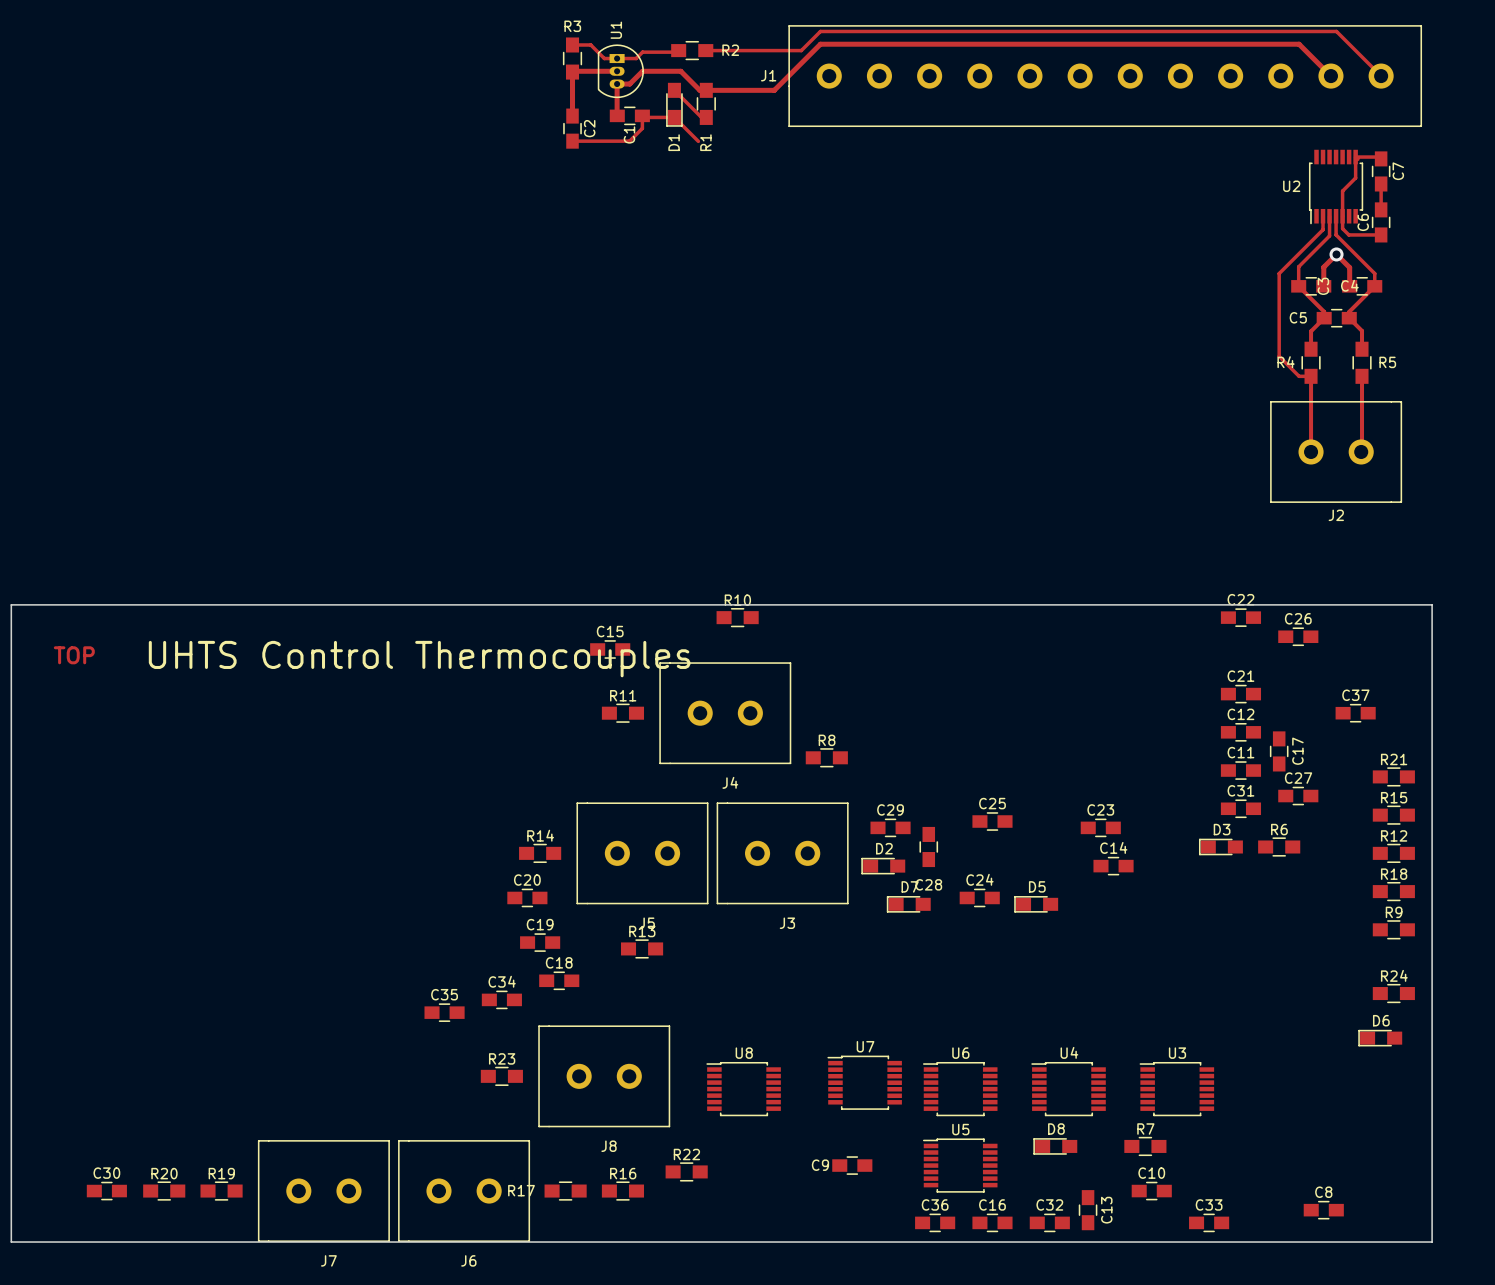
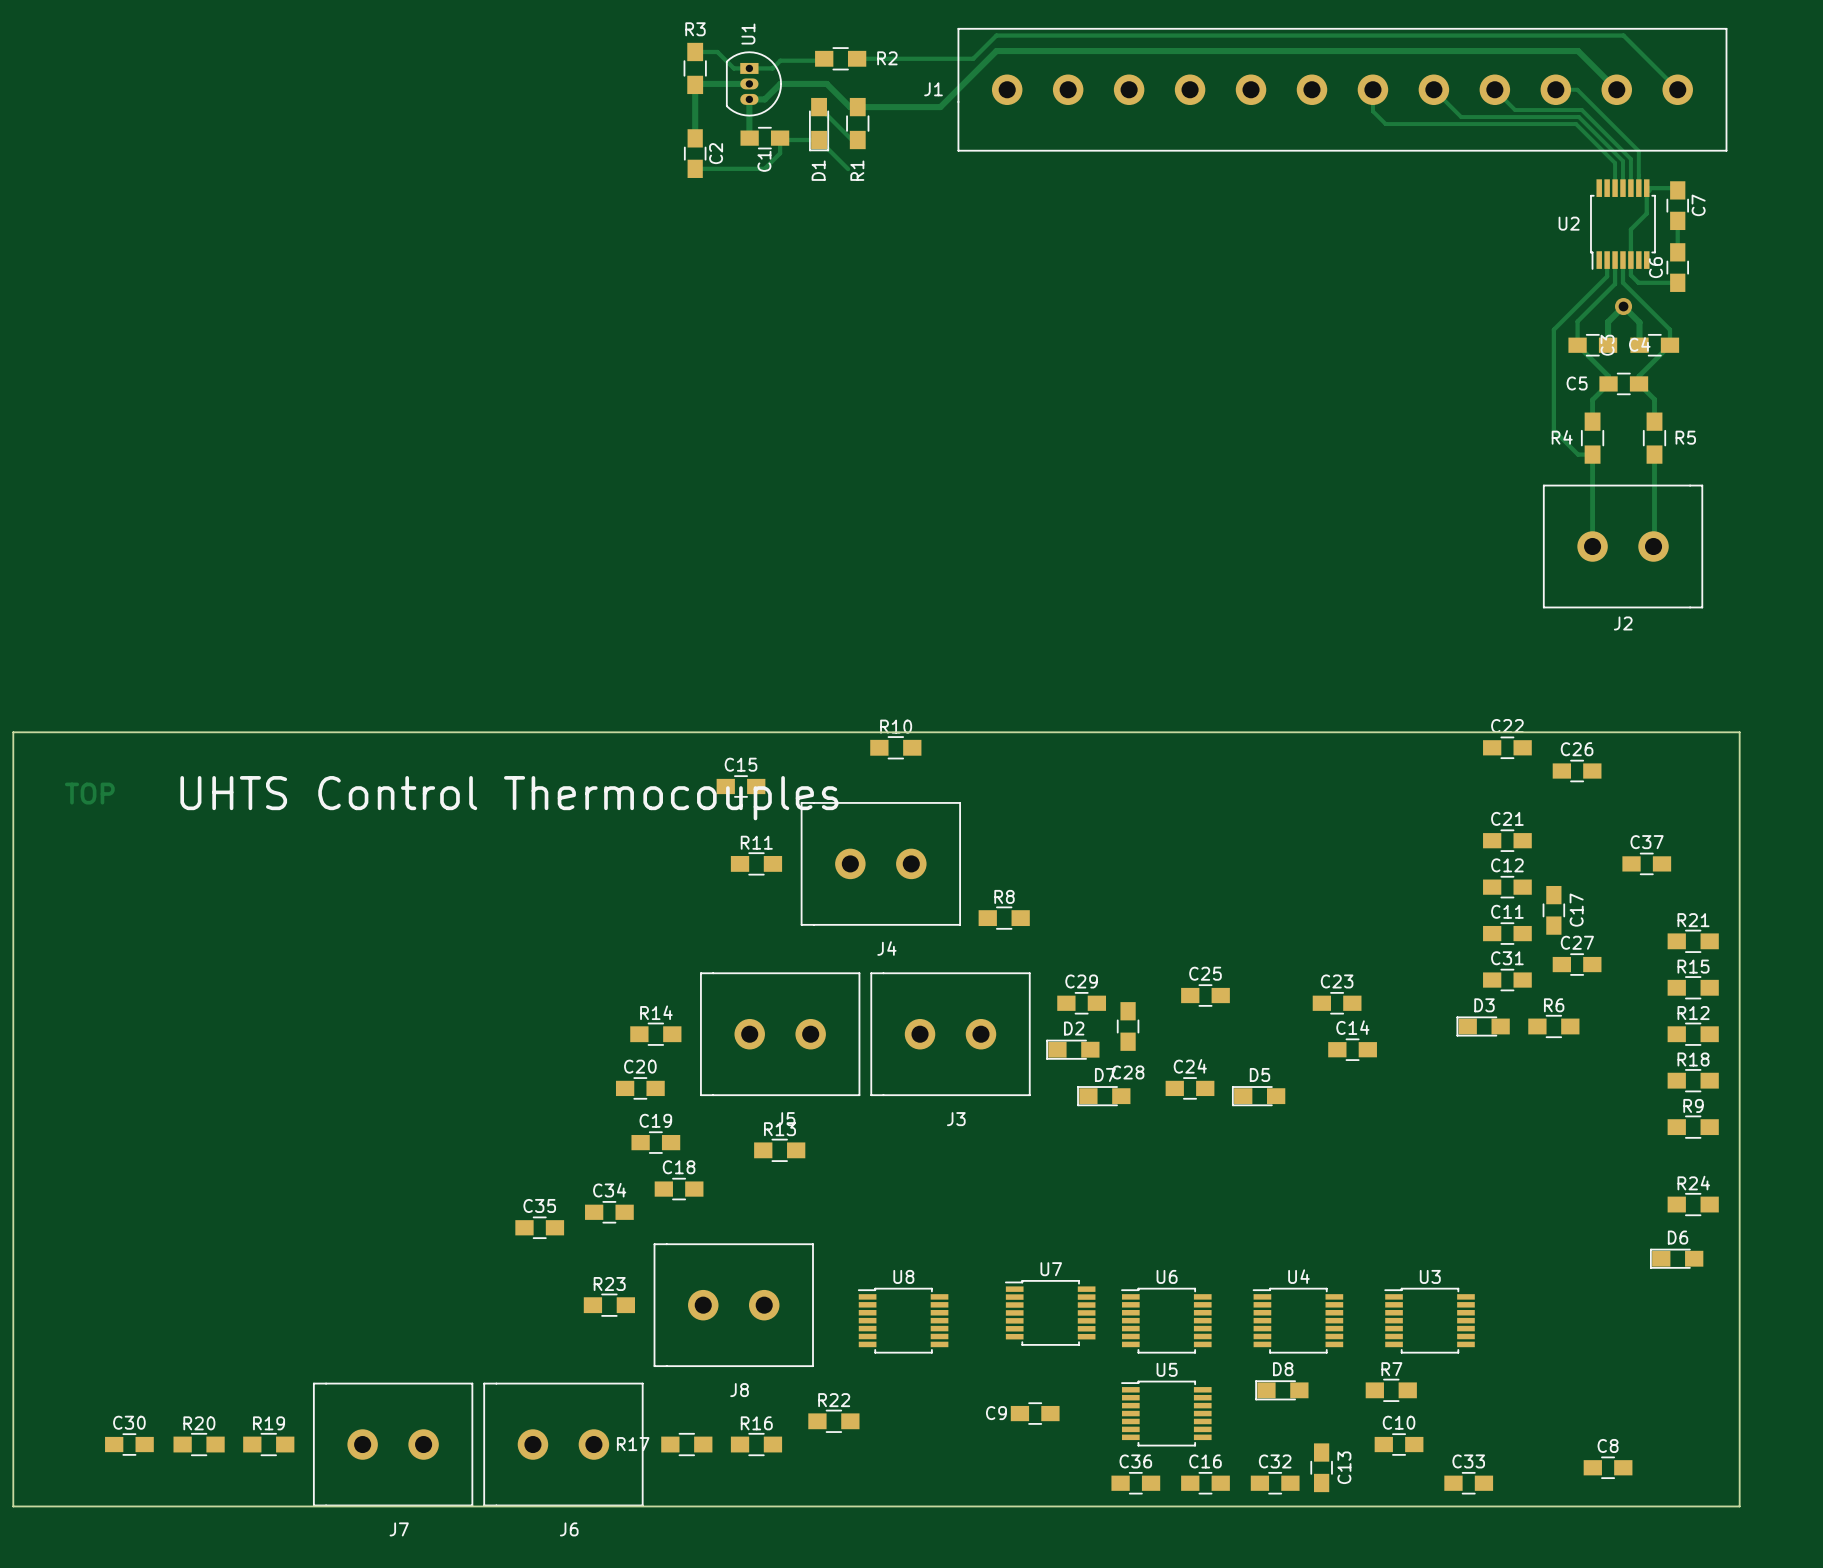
track: none -> (1372, 89) (1372, 111) (1385, 124) (1576, 124) (1615, 163) (1615, 188)
track: none -> (1433, 89) (1461, 117) (1578, 117) (1622, 161) (1622, 188)
track: none -> (1494, 89) (1515, 110) (1581, 110) (1630, 159) (1630, 188)
track: none -> (1555, 89) (1577, 89) (1638, 151) (1638, 188)

